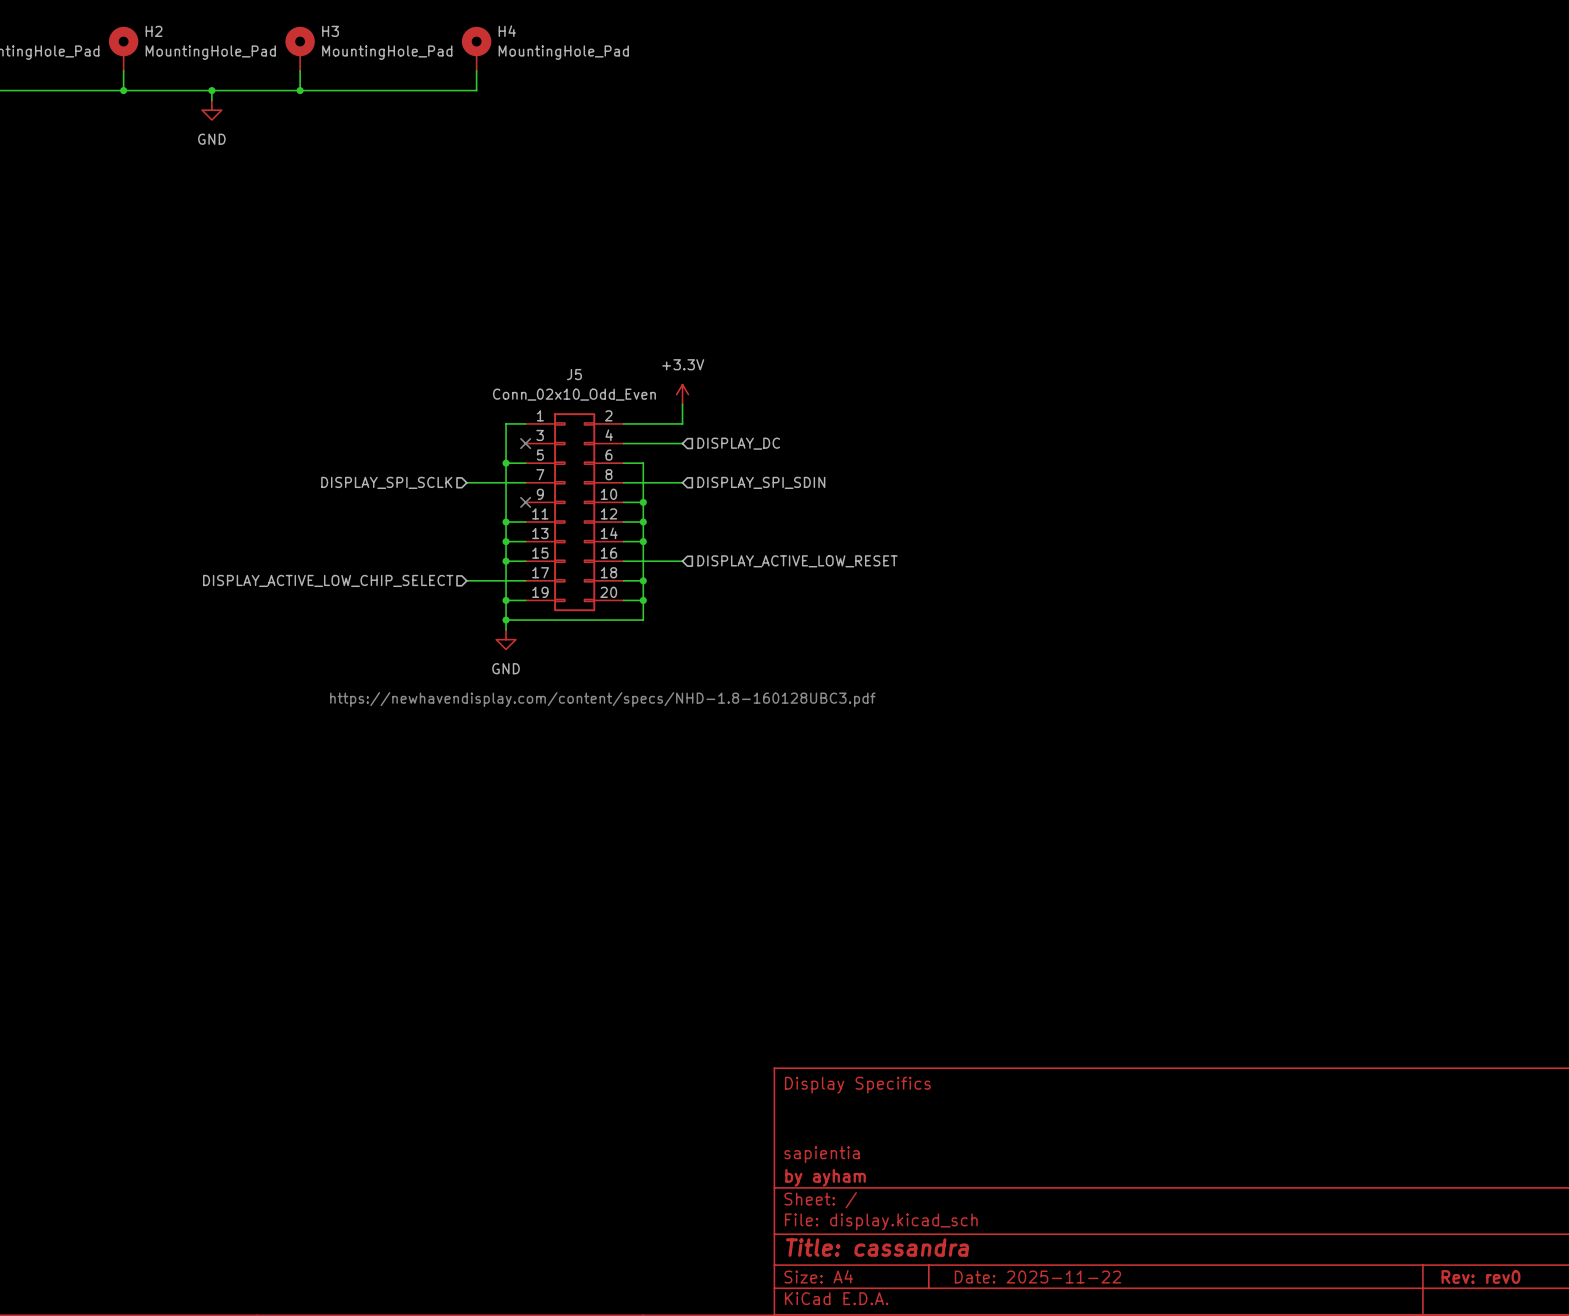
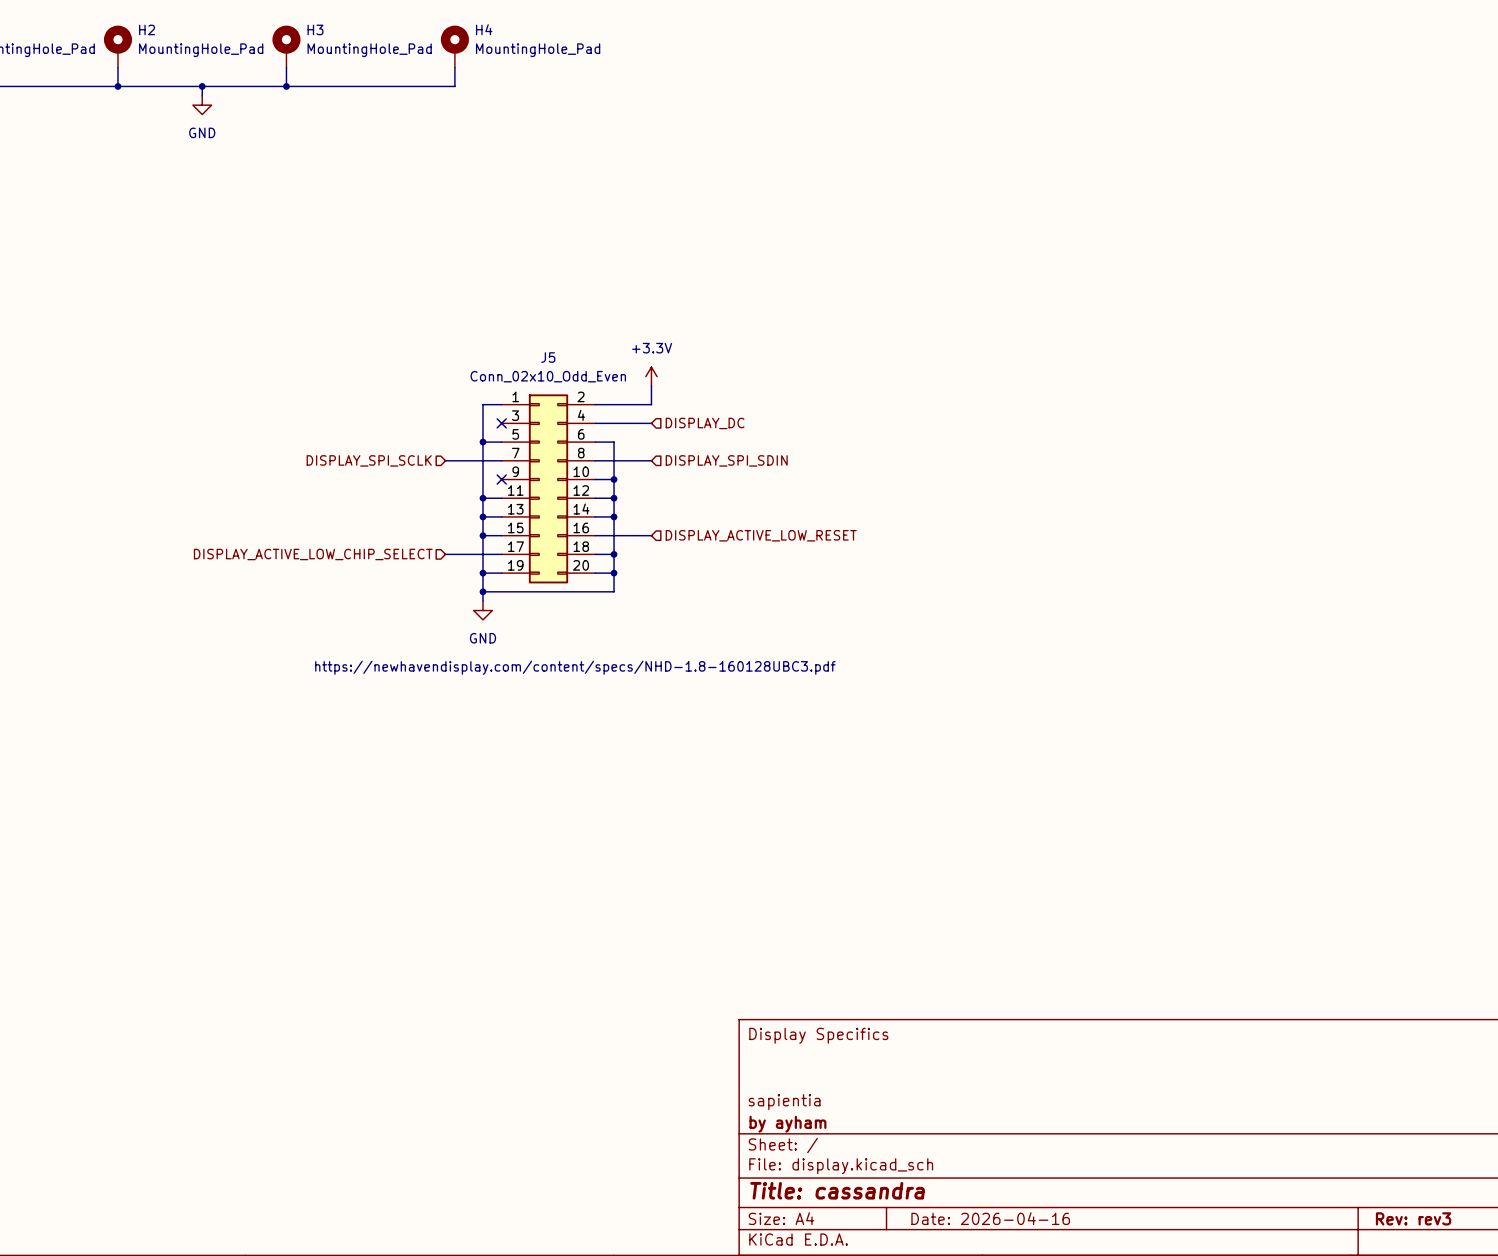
title block: Date: 2025-11-22 (1037, 1277) -> Date: 2026-04-16 (990, 1218)
title block: Rev: rev0 (1480, 1277) -> Rev: rev3 (1413, 1218)

